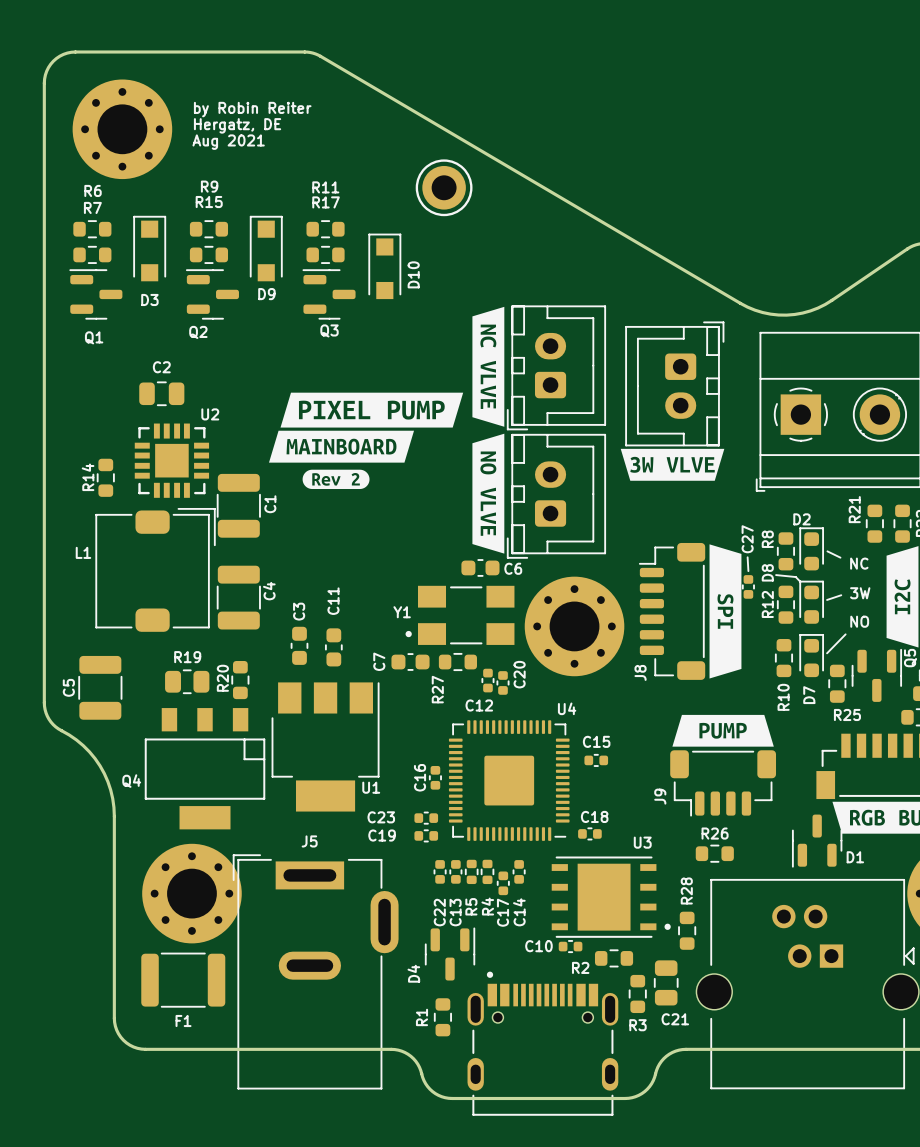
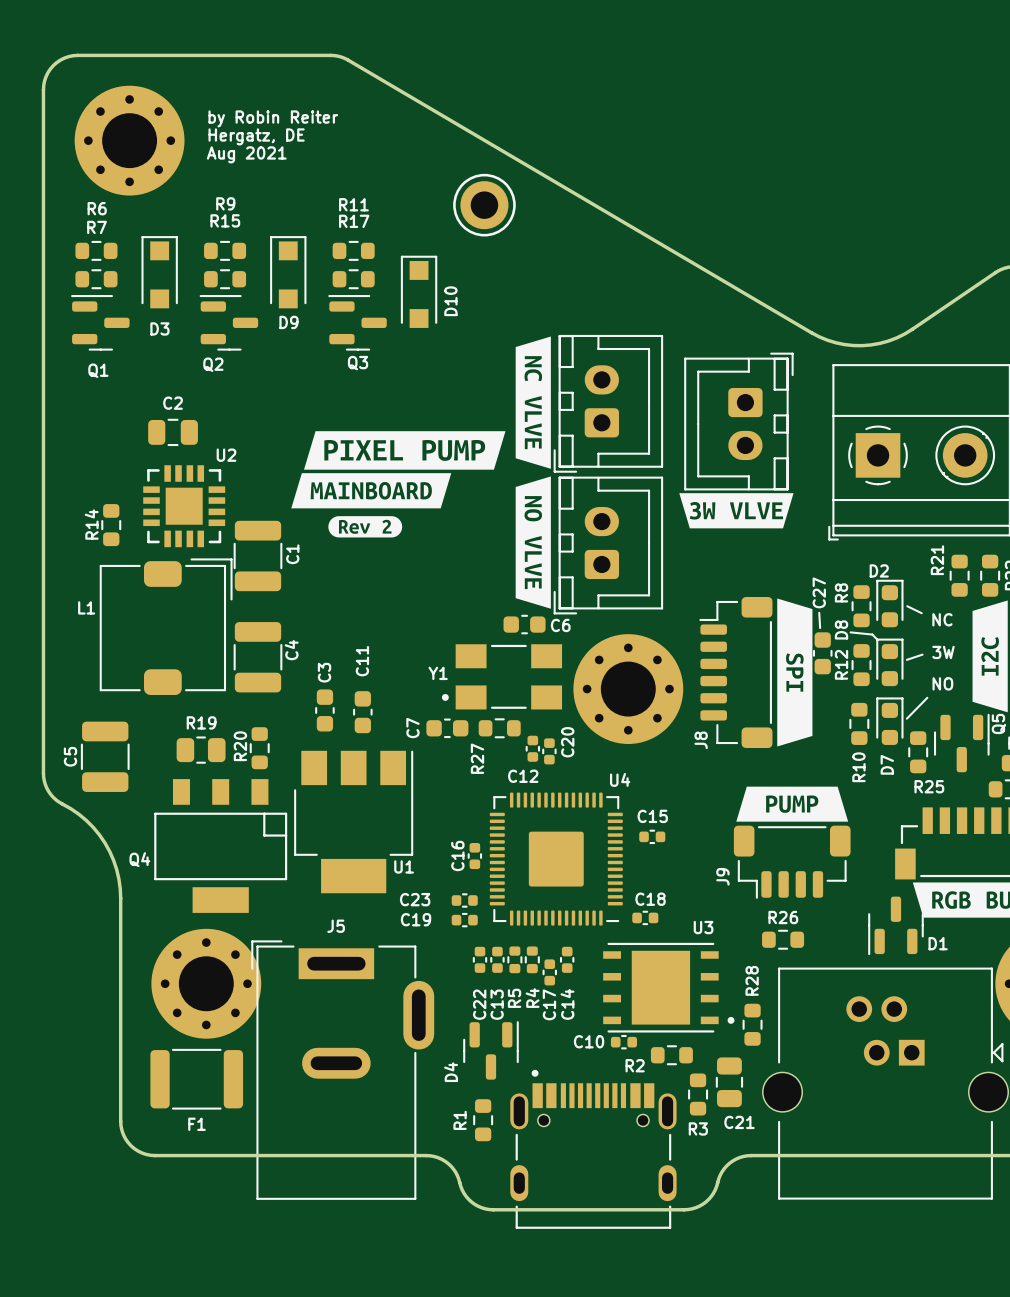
C27 footprint: [741, 575, 755, 599] -> [812, 632, 833, 675]

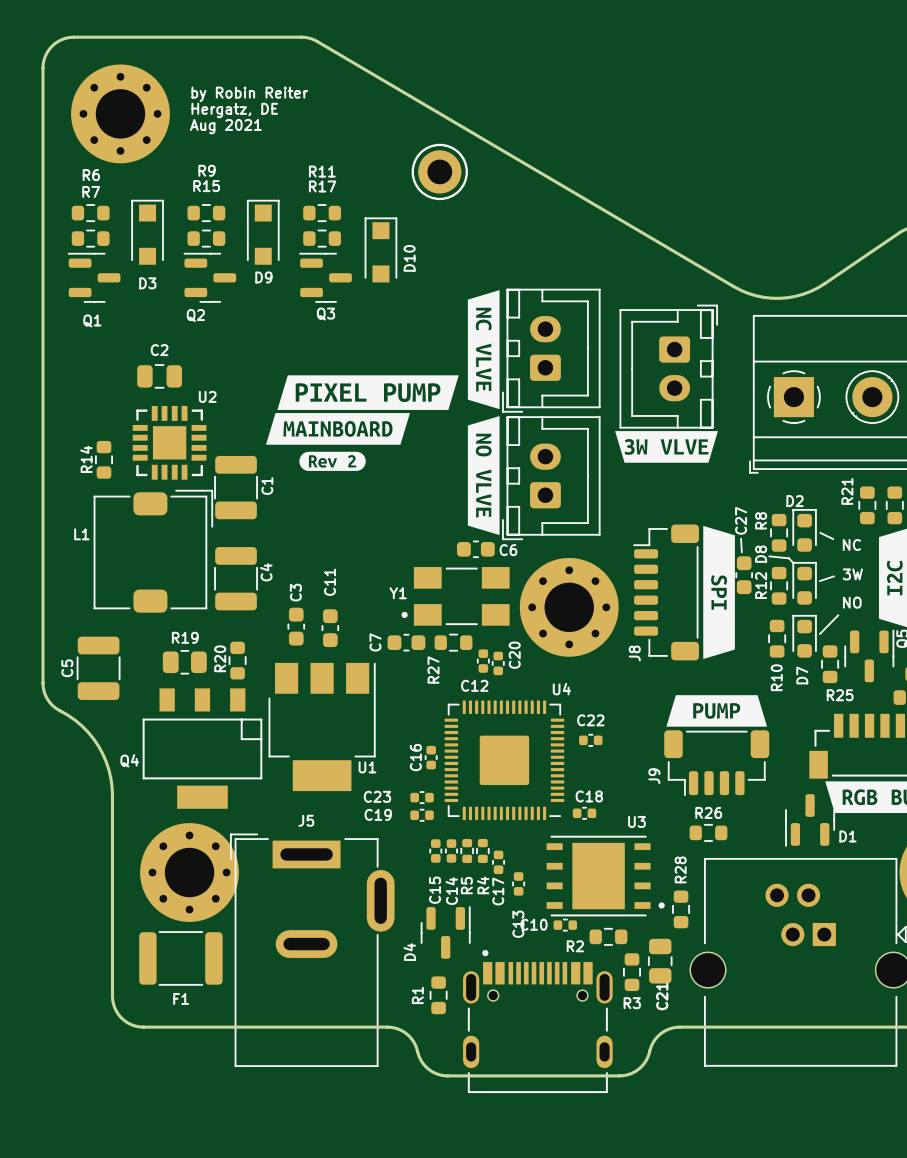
C15 name: C15 (652, 816) -> C22 (590, 720)
C14: (567, 959) -> none
C13: none -> (518, 883)
C22 name: C22 (479, 1004) -> C15 (435, 890)
C13 name: C13 (497, 1004) -> C14 (451, 891)
C21 name rotation: 0° (739, 1122) -> 90° counterclockwise (662, 996)

